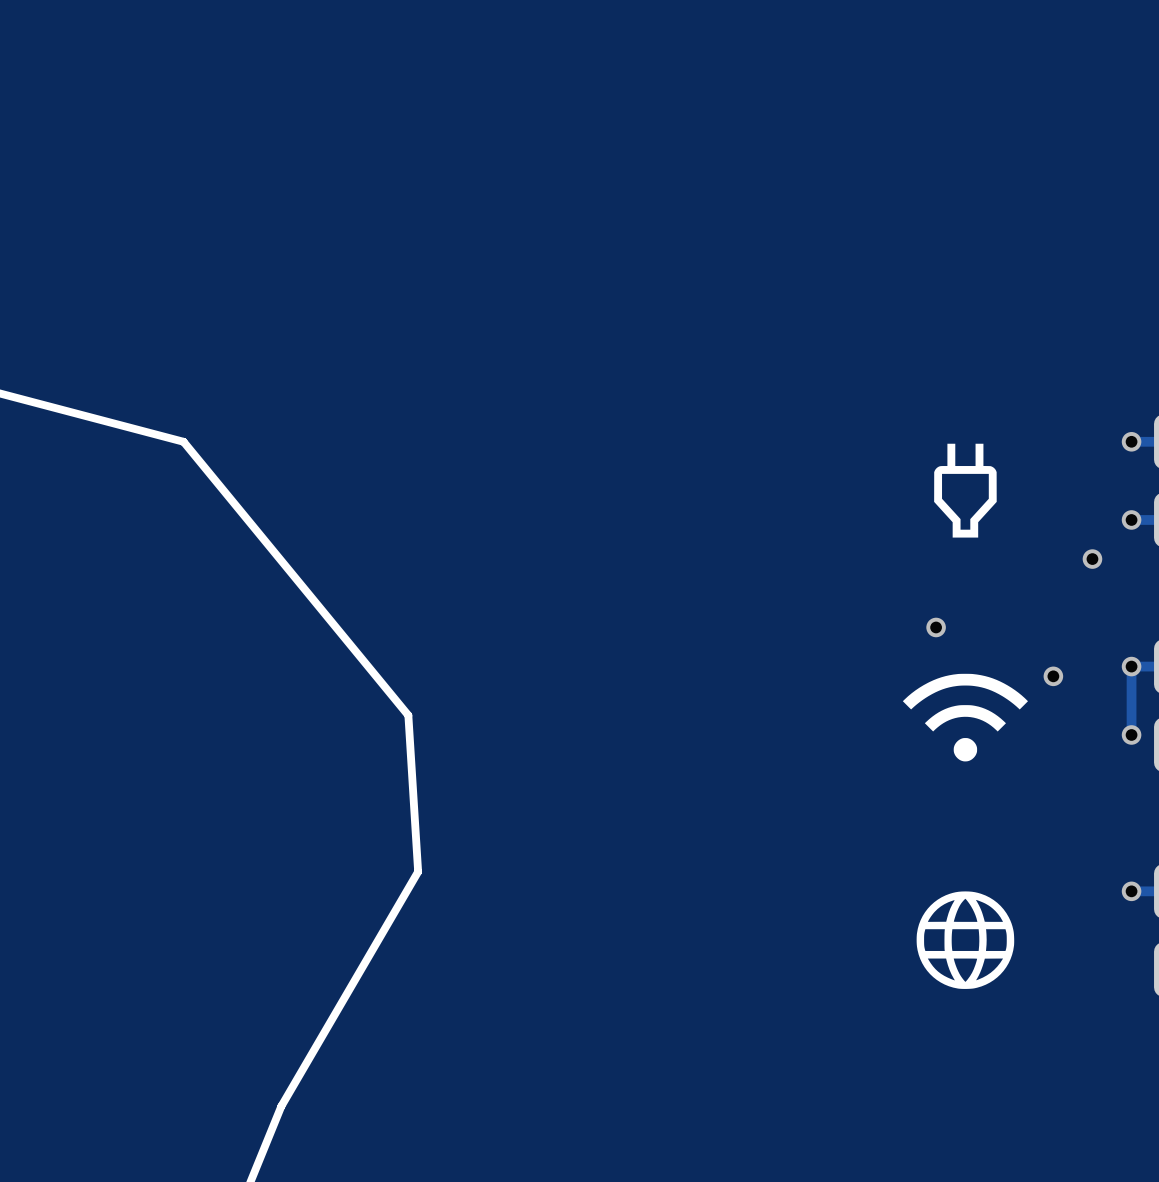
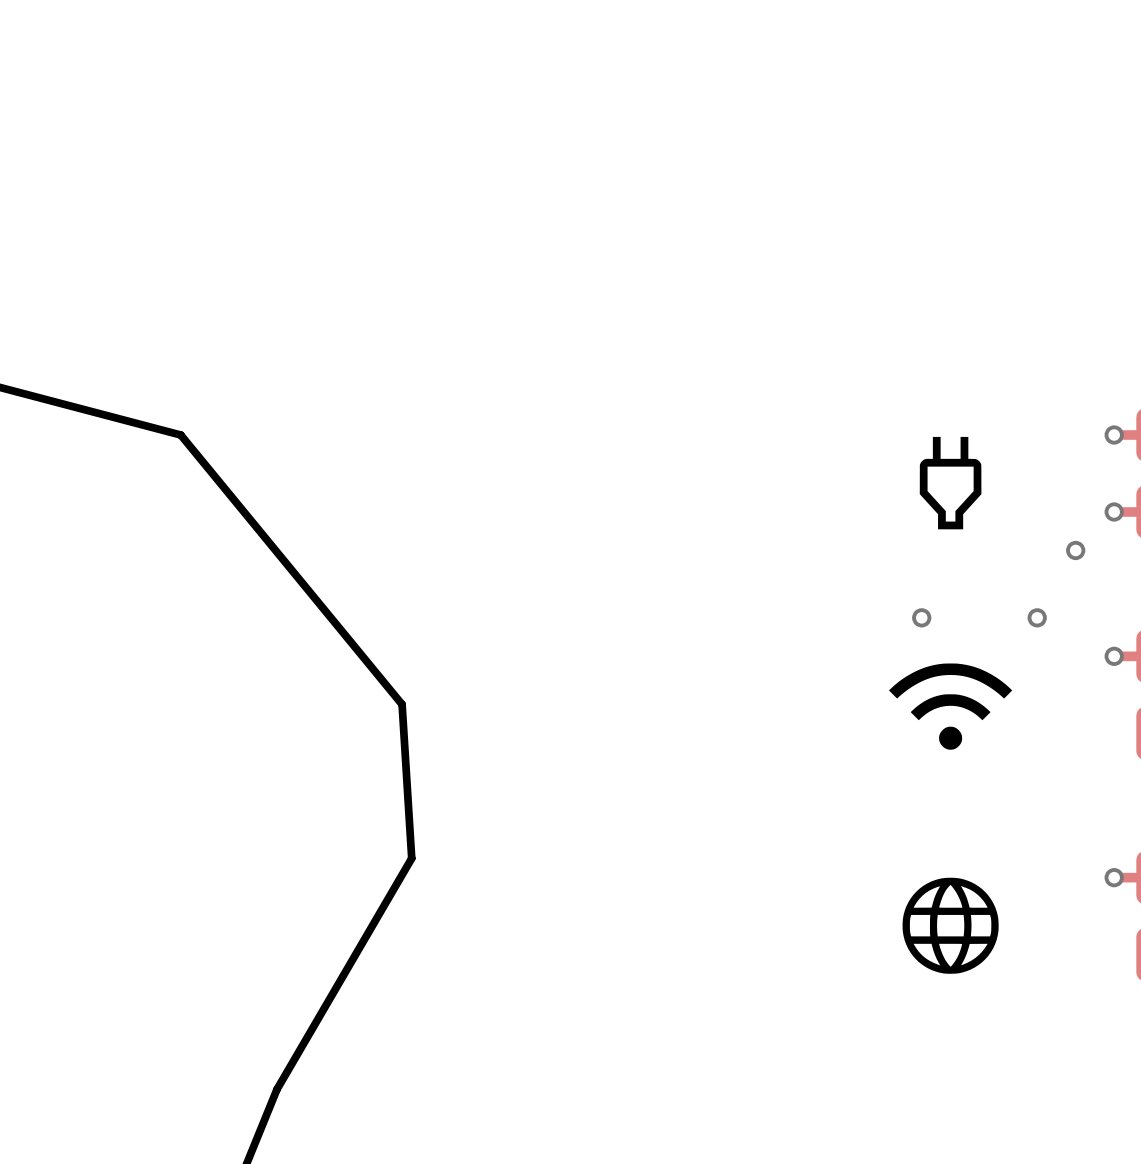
track: (1131, 666) (1131, 734) -> none
via position: (1053, 676) -> (1037, 617)
via: (1131, 734) -> none

